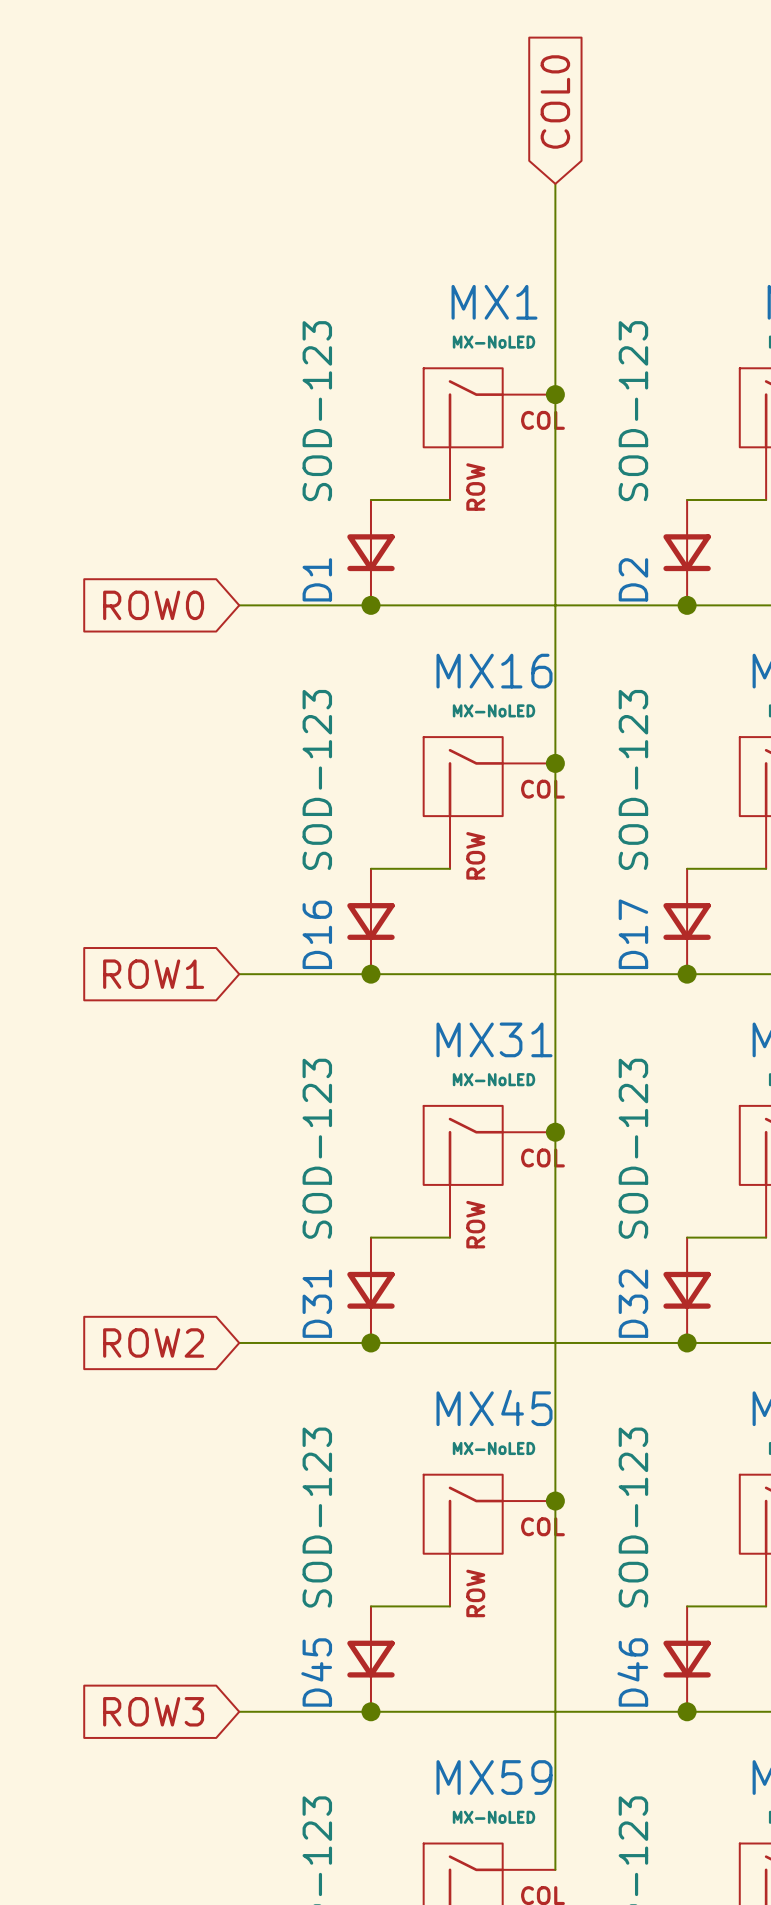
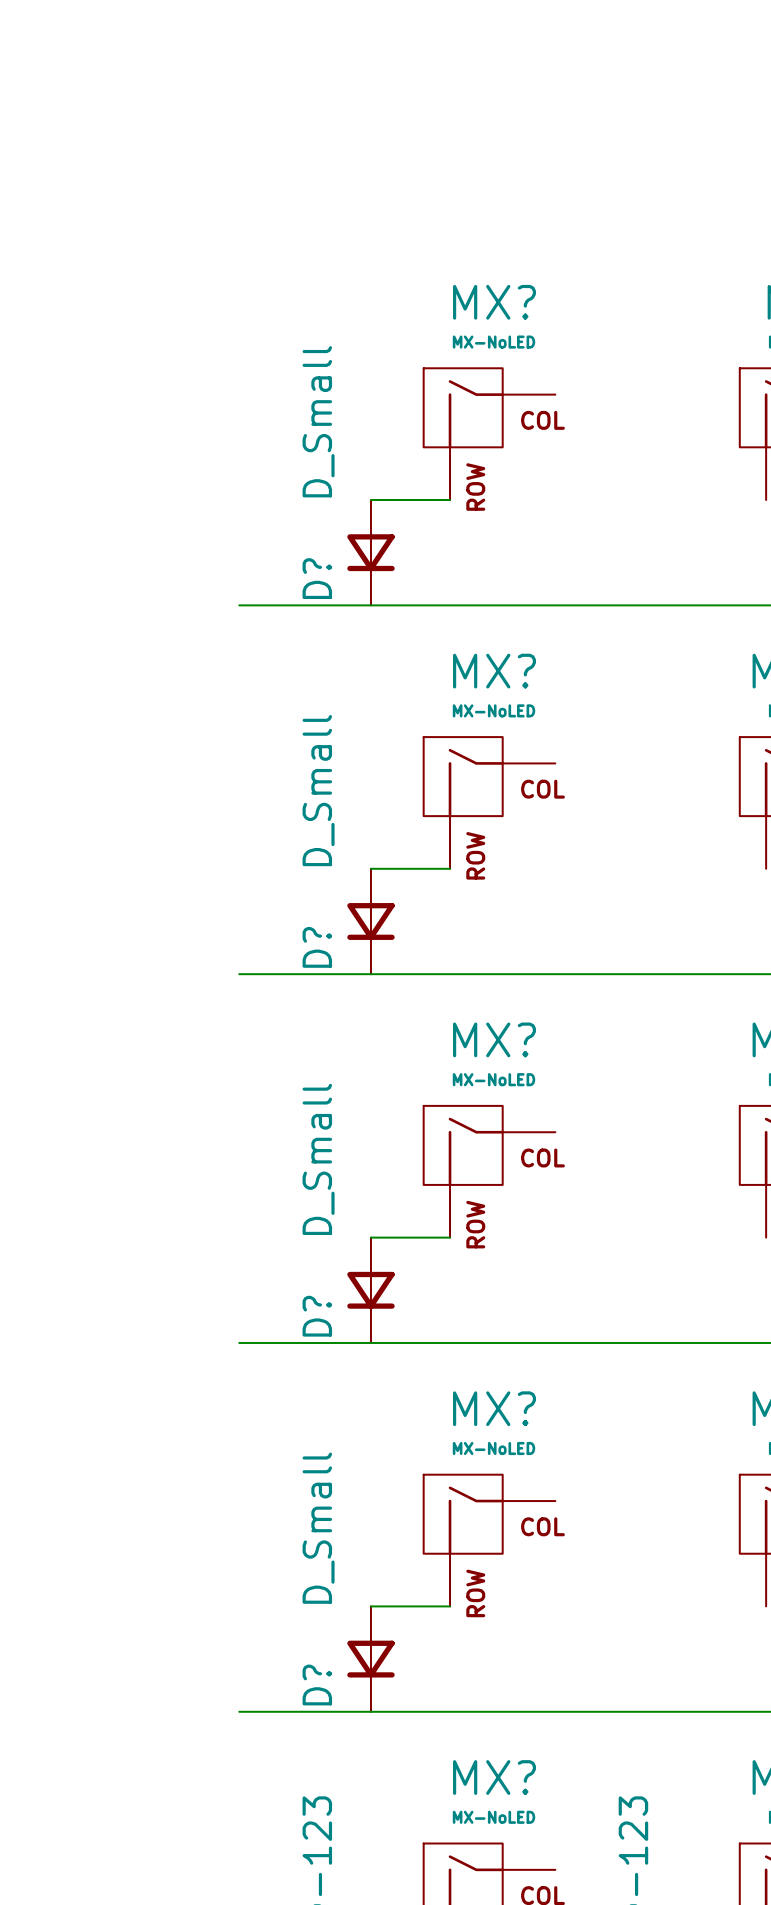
global label: COL0 (555, 101) -> none
wire: (555, 183) (555, 1869) -> none
MX1 name: MX1 (494, 302) -> MX? (494, 302)
junction: (555, 394) -> none
D1 value: SOD-123 (317, 411) -> D_Small (318, 421)
wire: (687, 499) (766, 499) -> none
D2: SOD-123 (687, 552) -> none
D1 name: D1 (317, 579) -> D? (317, 578)
global label: ROW0 (153, 605) -> none
junction: (370, 605) -> none
junction: (687, 605) -> none
MX16 name: MX16 (494, 671) -> MX? (494, 671)
junction: (555, 763) -> none
D16 value: SOD-123 (317, 779) -> D_Small (318, 790)
wire: (687, 868) (766, 868) -> none
D17: SOD-123 (687, 921) -> none
D16 name: D16 (317, 934) -> D? (317, 947)
global label: ROW1 (153, 974) -> none
junction: (370, 974) -> none
junction: (687, 974) -> none
MX31 name: MX31 (494, 1039) -> MX? (494, 1039)
junction: (555, 1132) -> none
D31 value: SOD-123 (317, 1148) -> D_Small (318, 1159)
wire: (687, 1237) (766, 1237) -> none
D32: SOD-123 (687, 1290) -> none
D31 name: D31 (317, 1303) -> D? (317, 1316)
global label: ROW2 (153, 1342) -> none
junction: (370, 1342) -> none
junction: (687, 1342) -> none
MX45 name: MX45 (494, 1407) -> MX? (494, 1408)
junction: (555, 1501) -> none
D45 value: SOD-123 (317, 1517) -> D_Small (318, 1528)
wire: (687, 1606) (766, 1606) -> none
D46: SOD-123 (687, 1659) -> none
D45 name: D45 (316, 1672) -> D? (317, 1685)
global label: ROW3 (153, 1711) -> none
junction: (370, 1711) -> none
junction: (687, 1711) -> none
MX59 name: MX59 (494, 1777) -> MX? (494, 1777)

